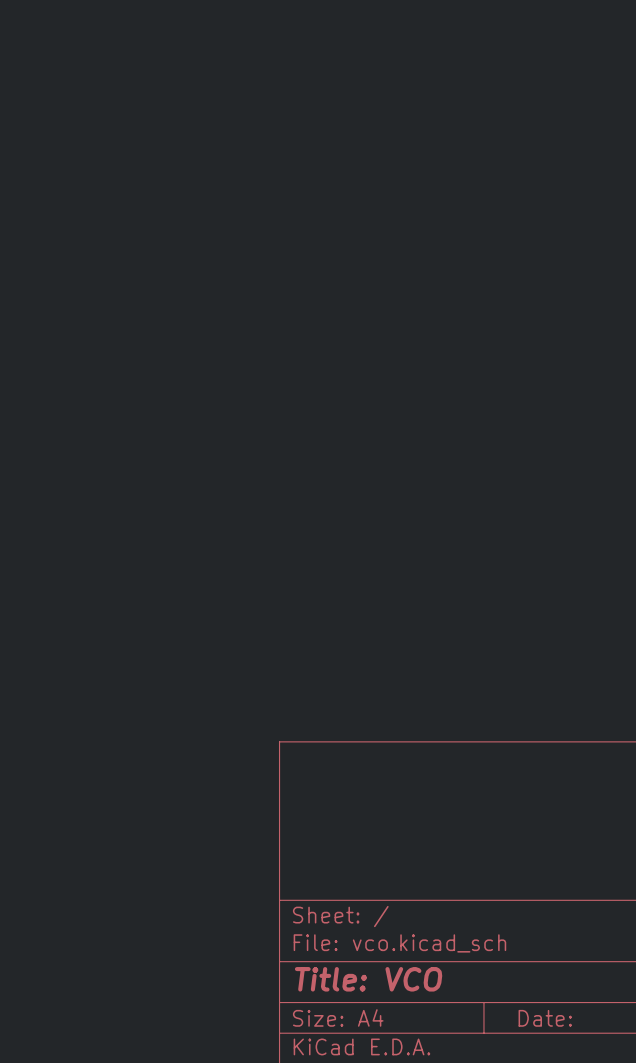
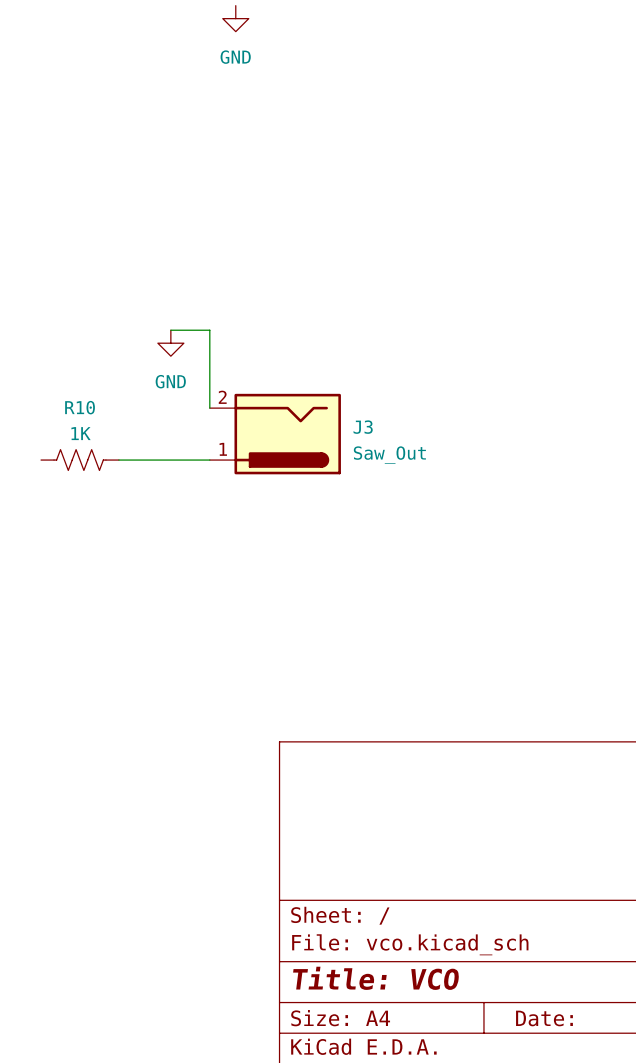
power symbol: none -> GND (235, 18)
wire: none -> (170, 330) (209, 330) (209, 408)
power symbol: none -> GND (170, 343)
J3: none -> Saw_Out (275, 434)
R10: none -> 1K (79, 460)
wire: none -> (118, 460) (209, 460)

